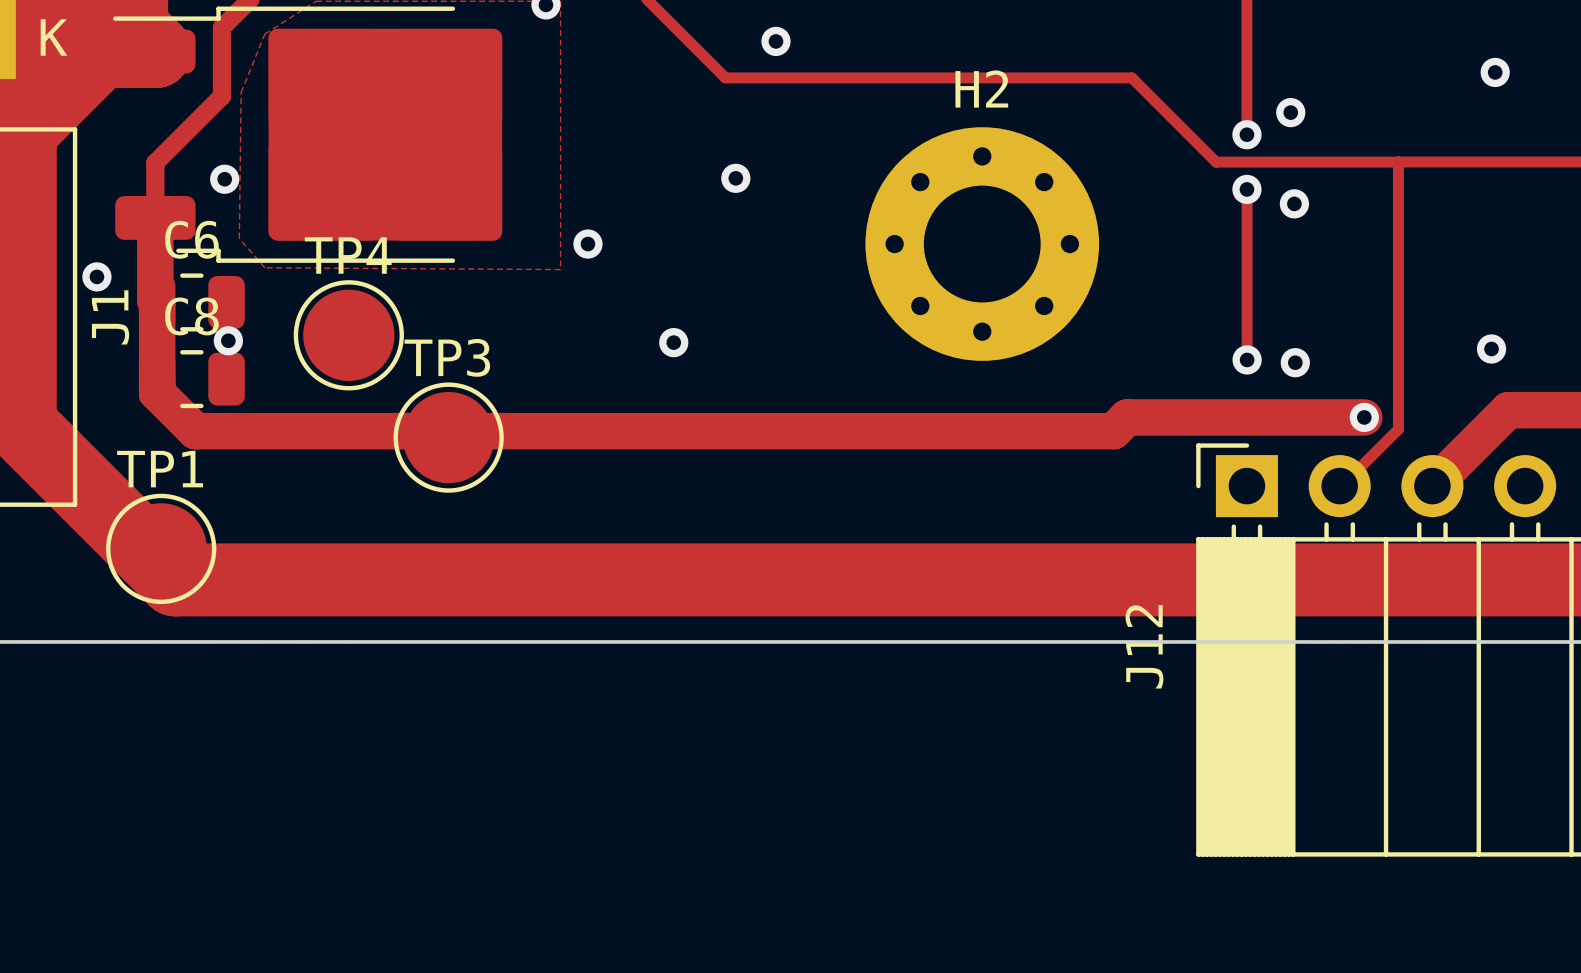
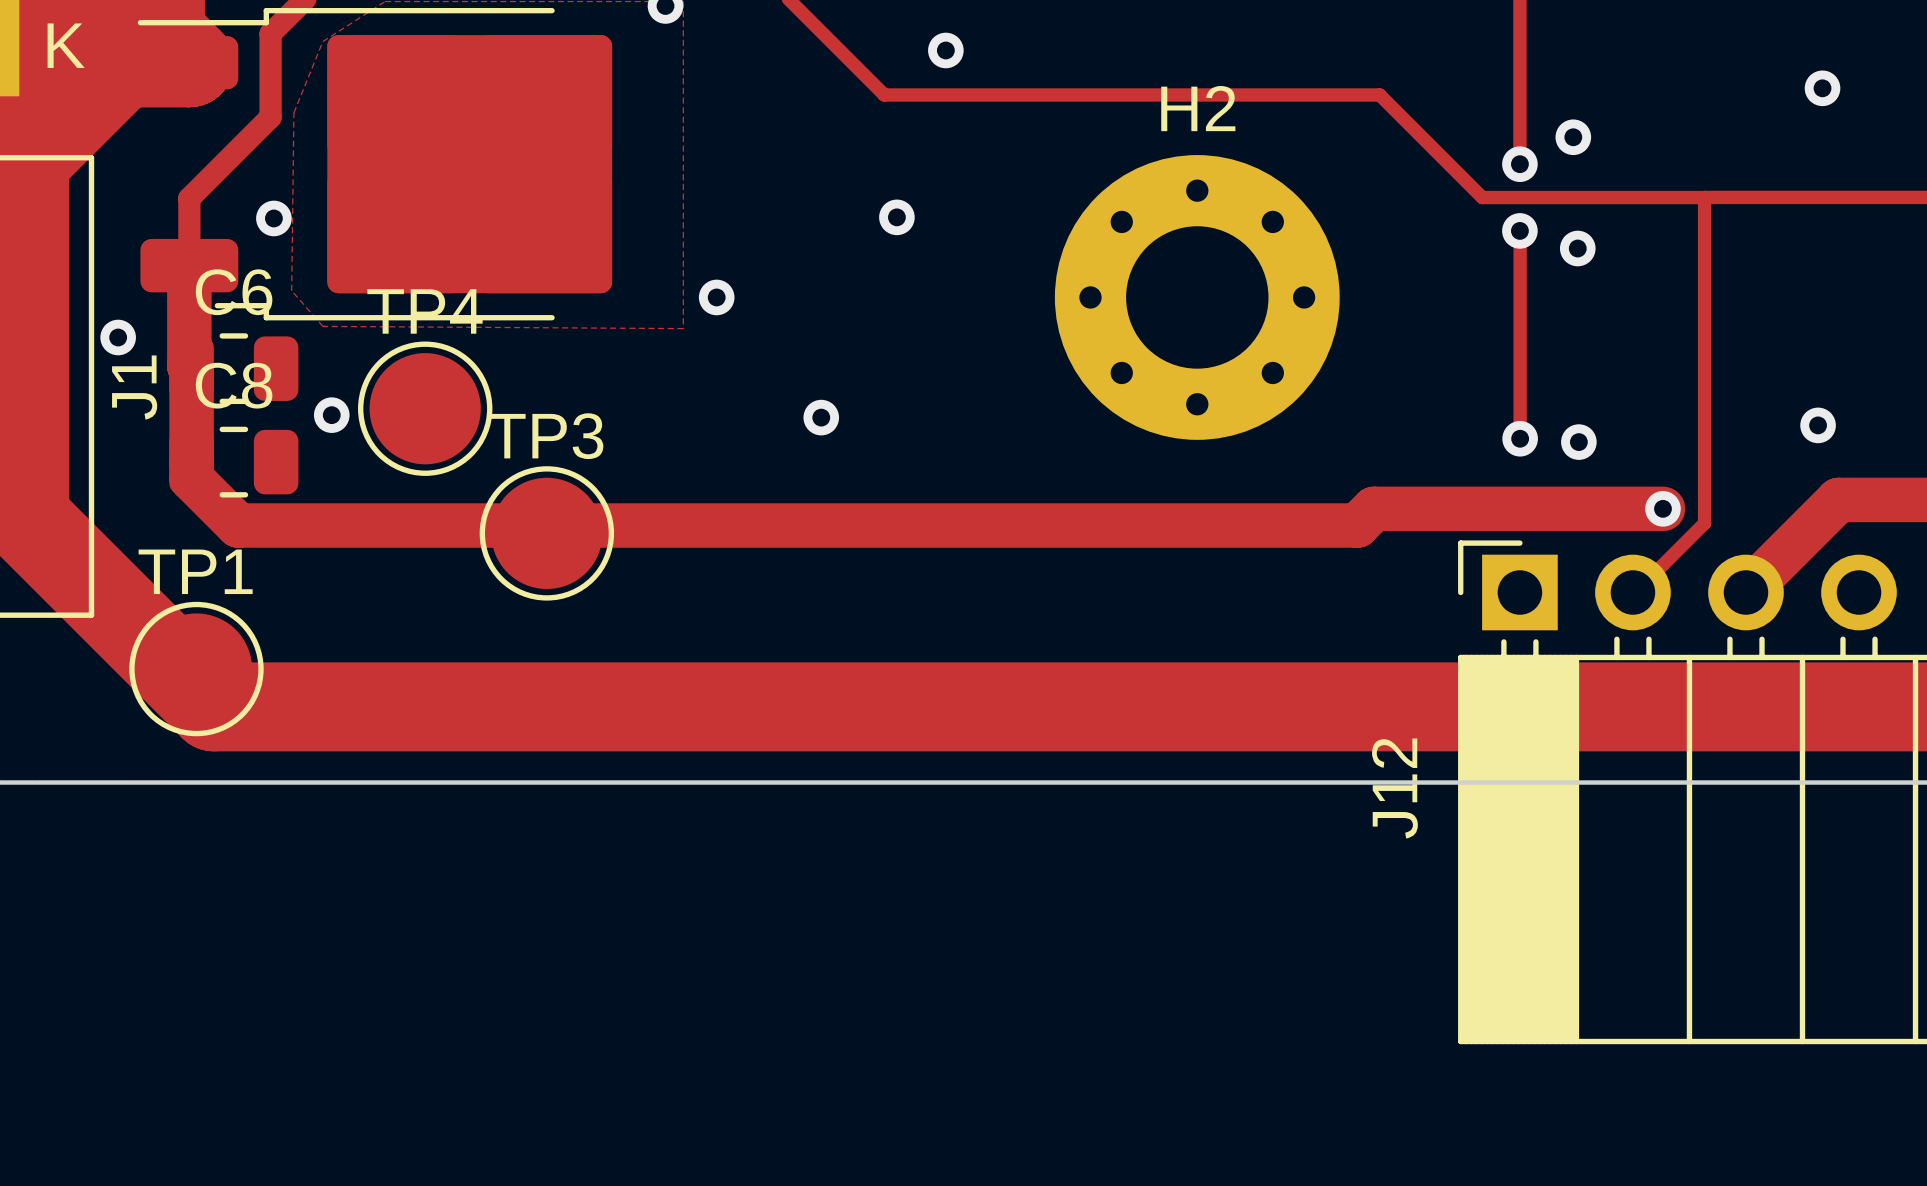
via position: (228, 340) -> (331, 415)

